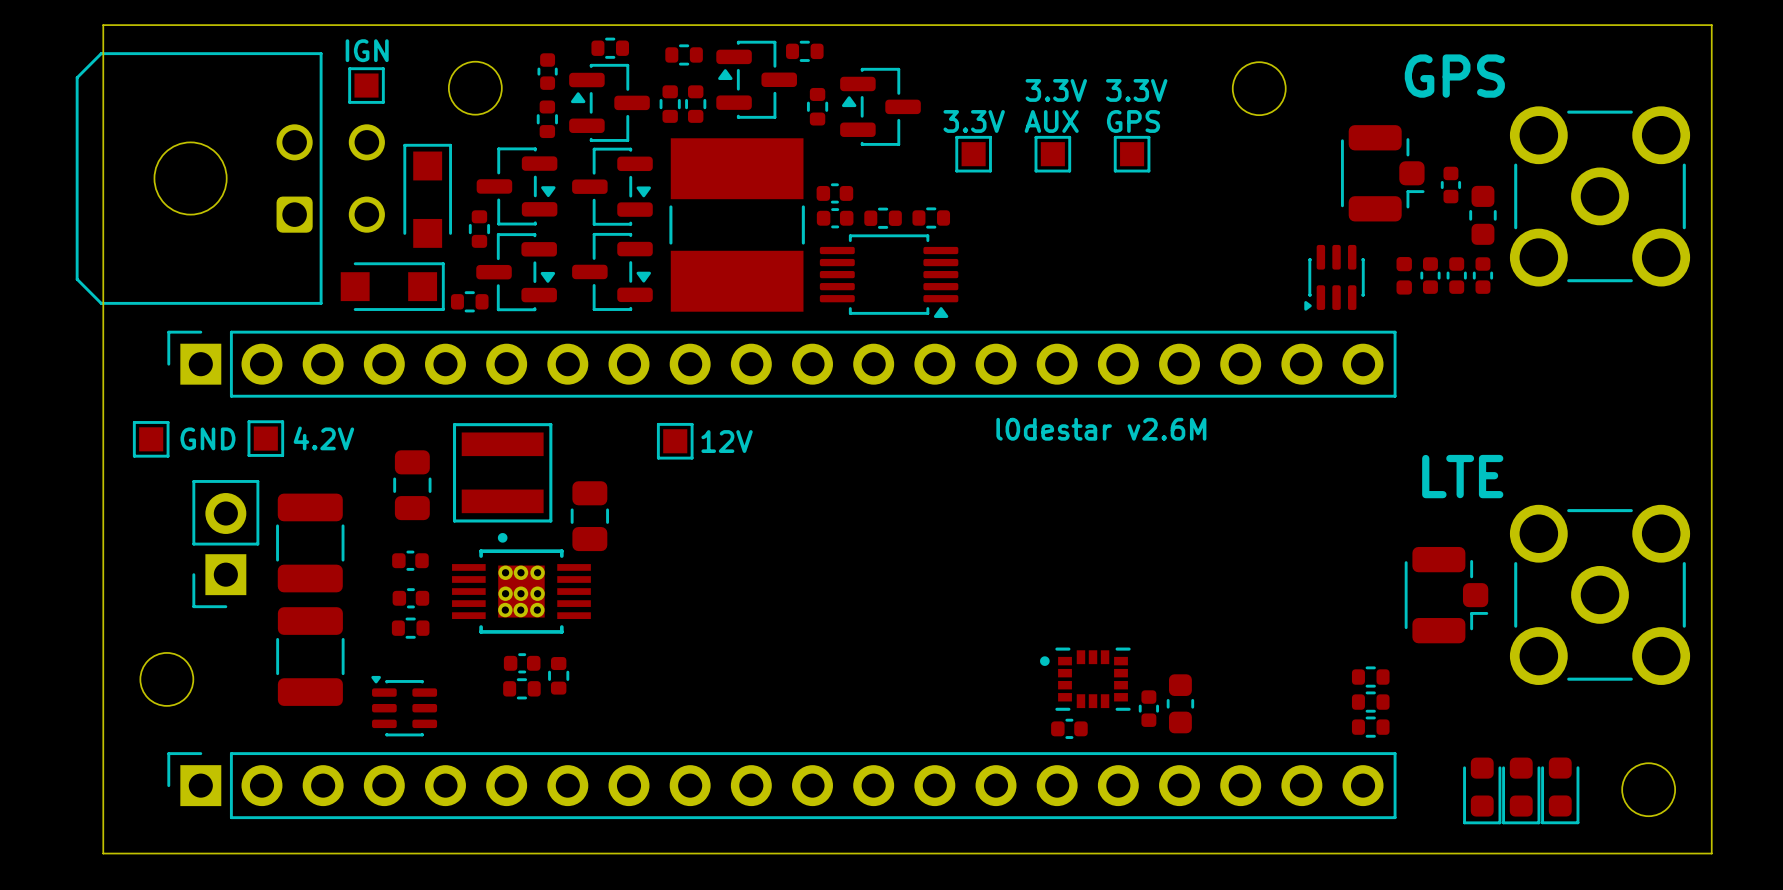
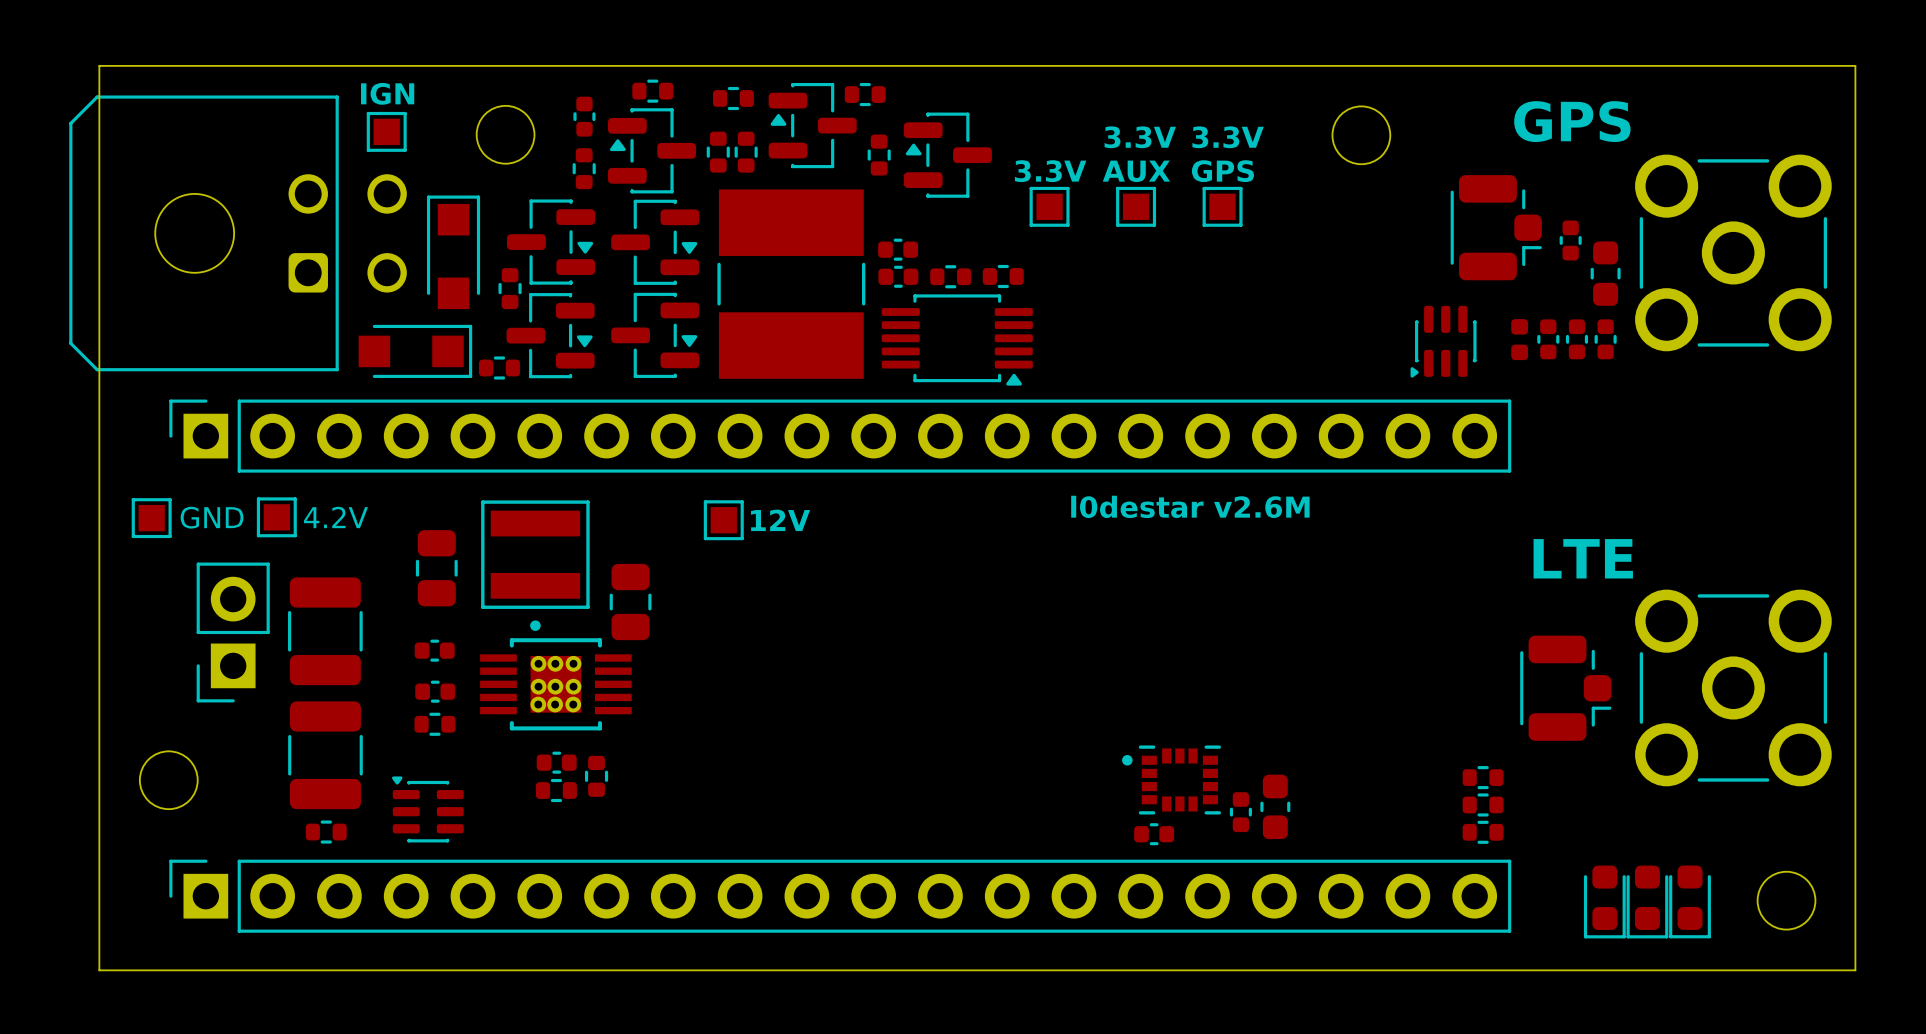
part: none -> (326, 832)

